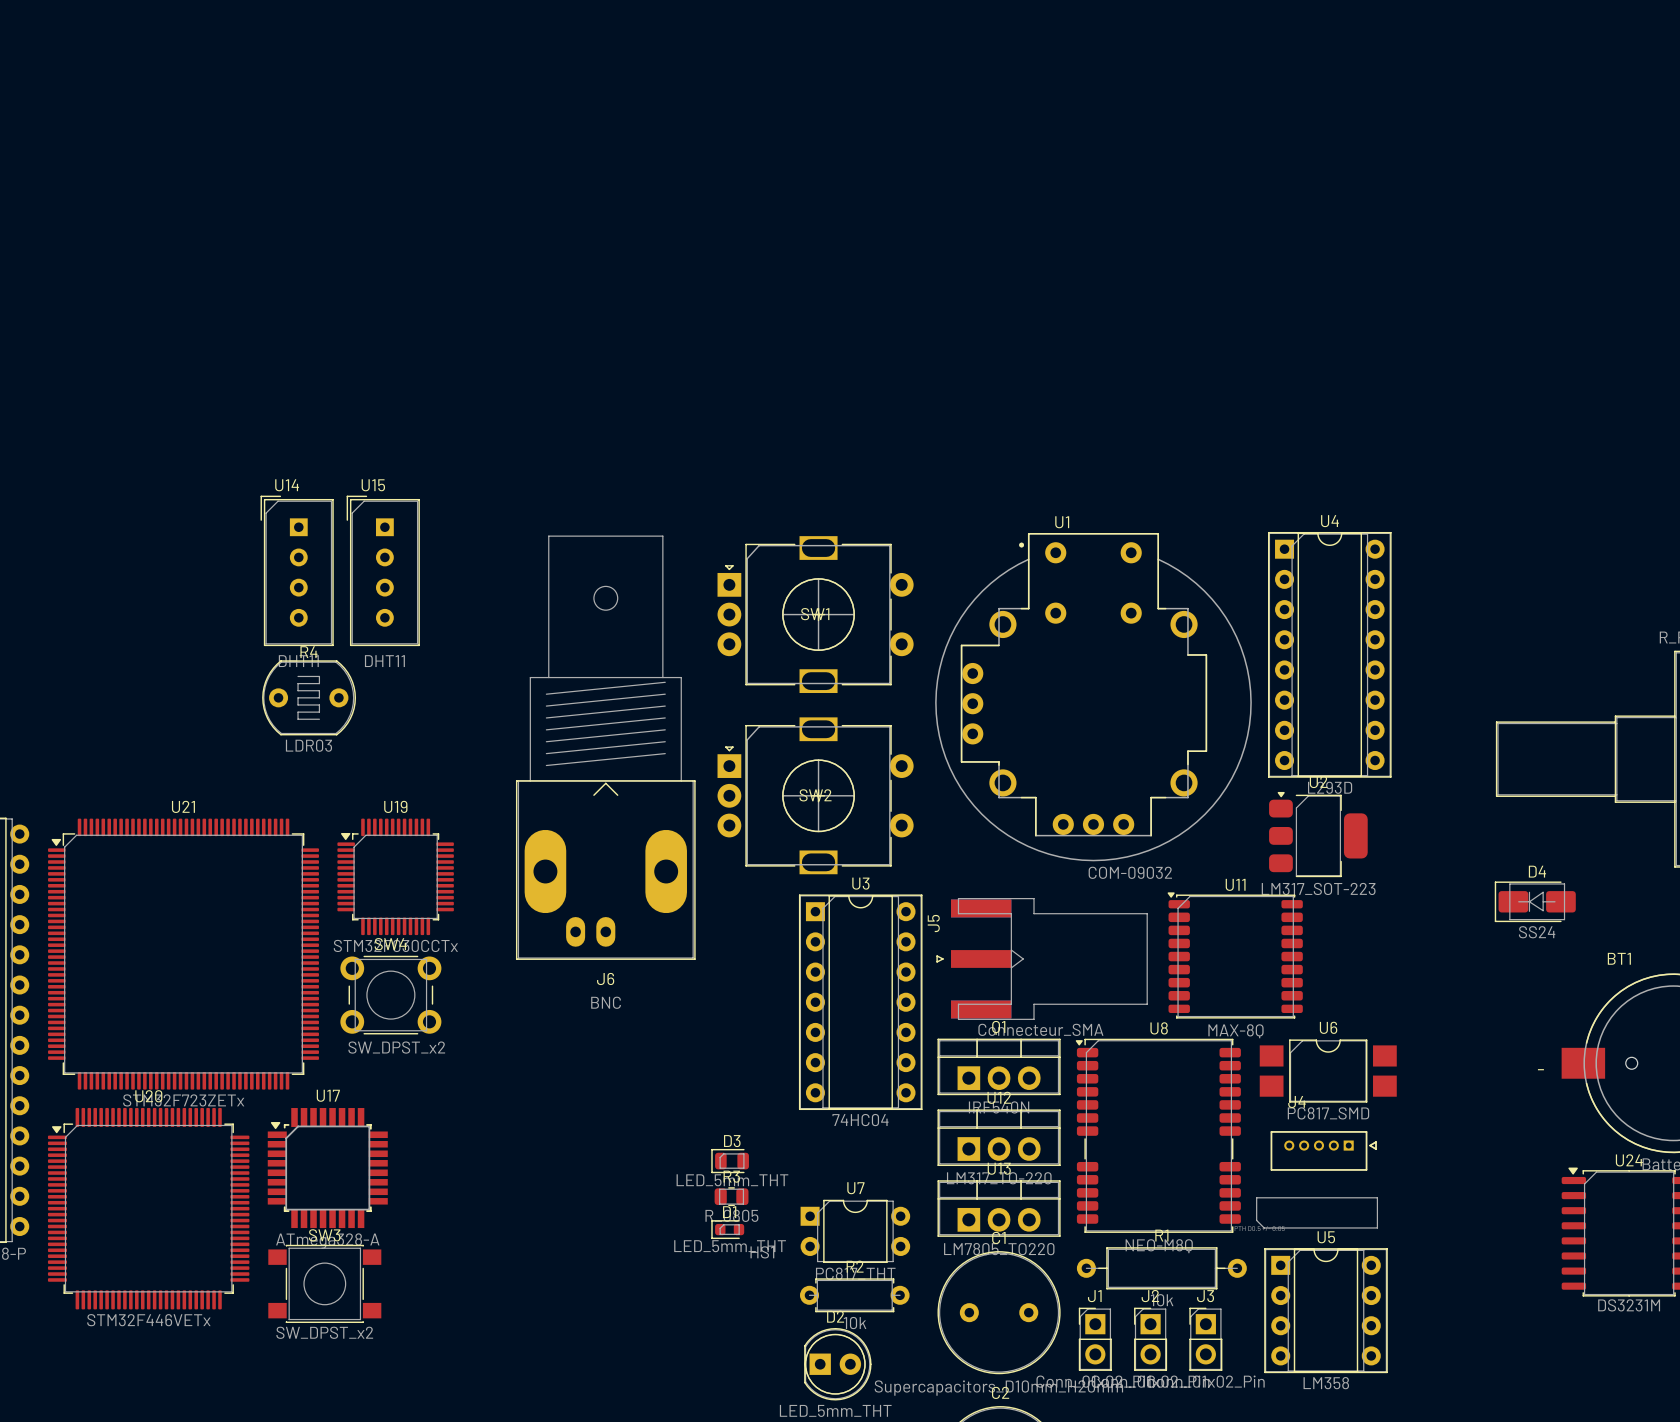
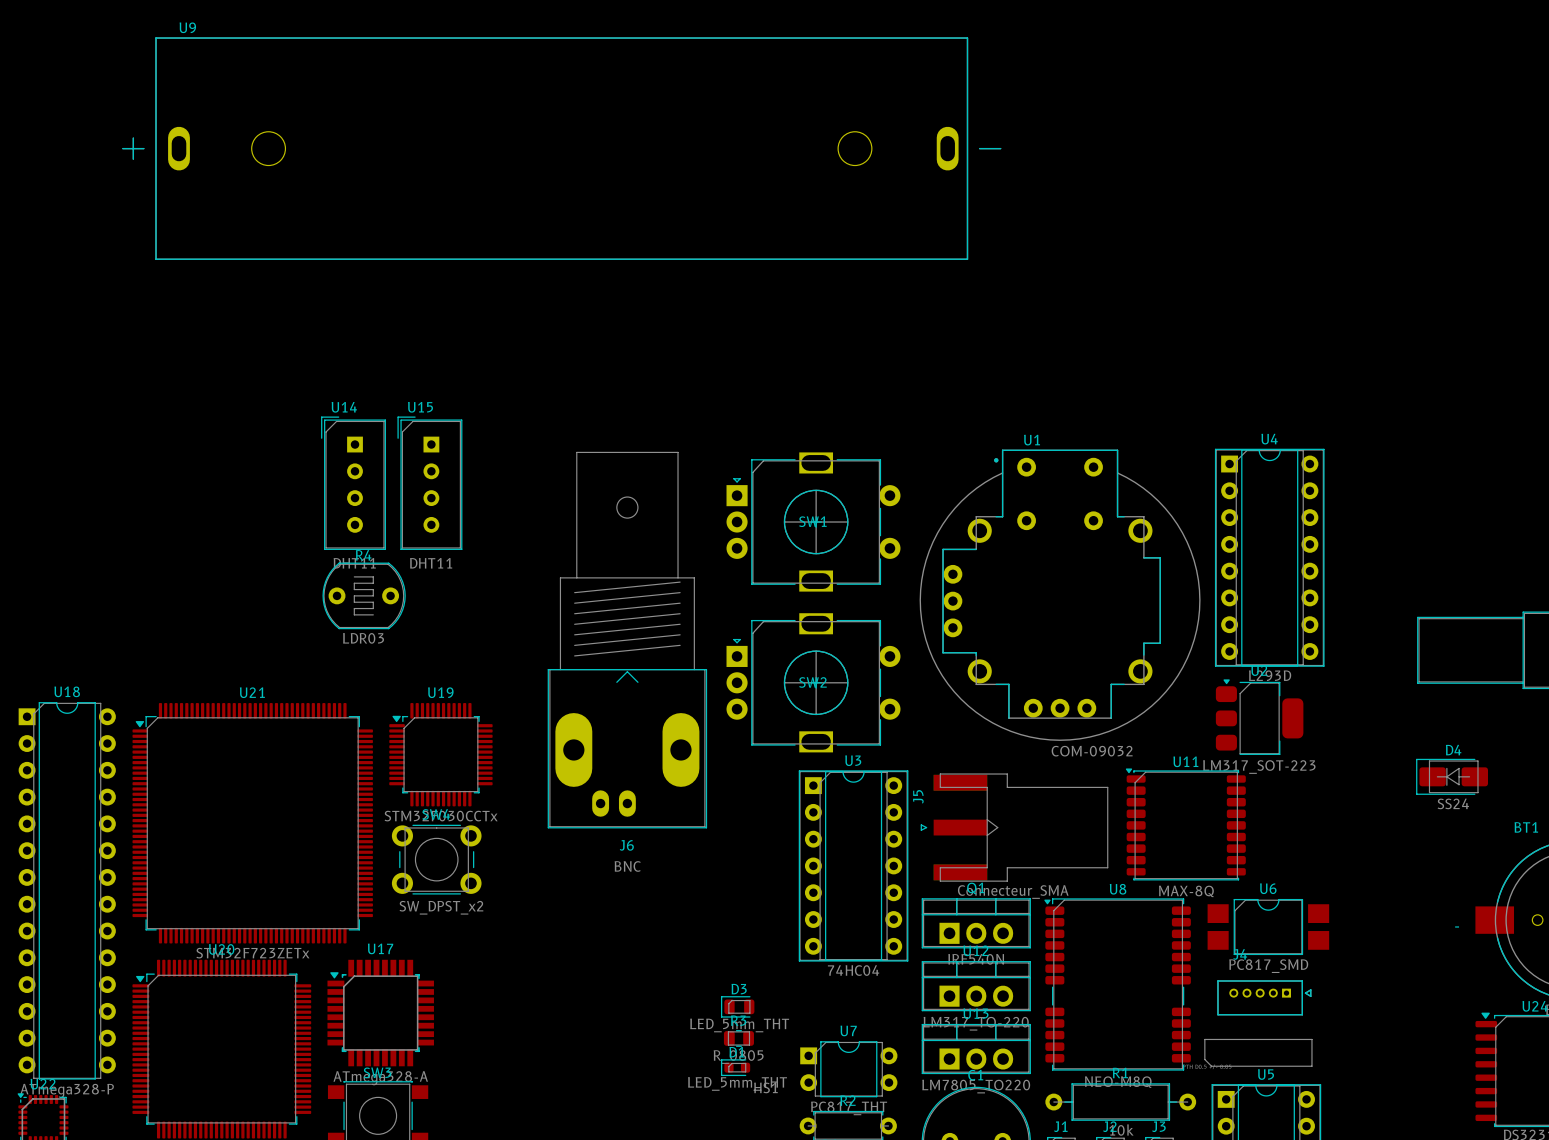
U9: none -> (561, 148)

